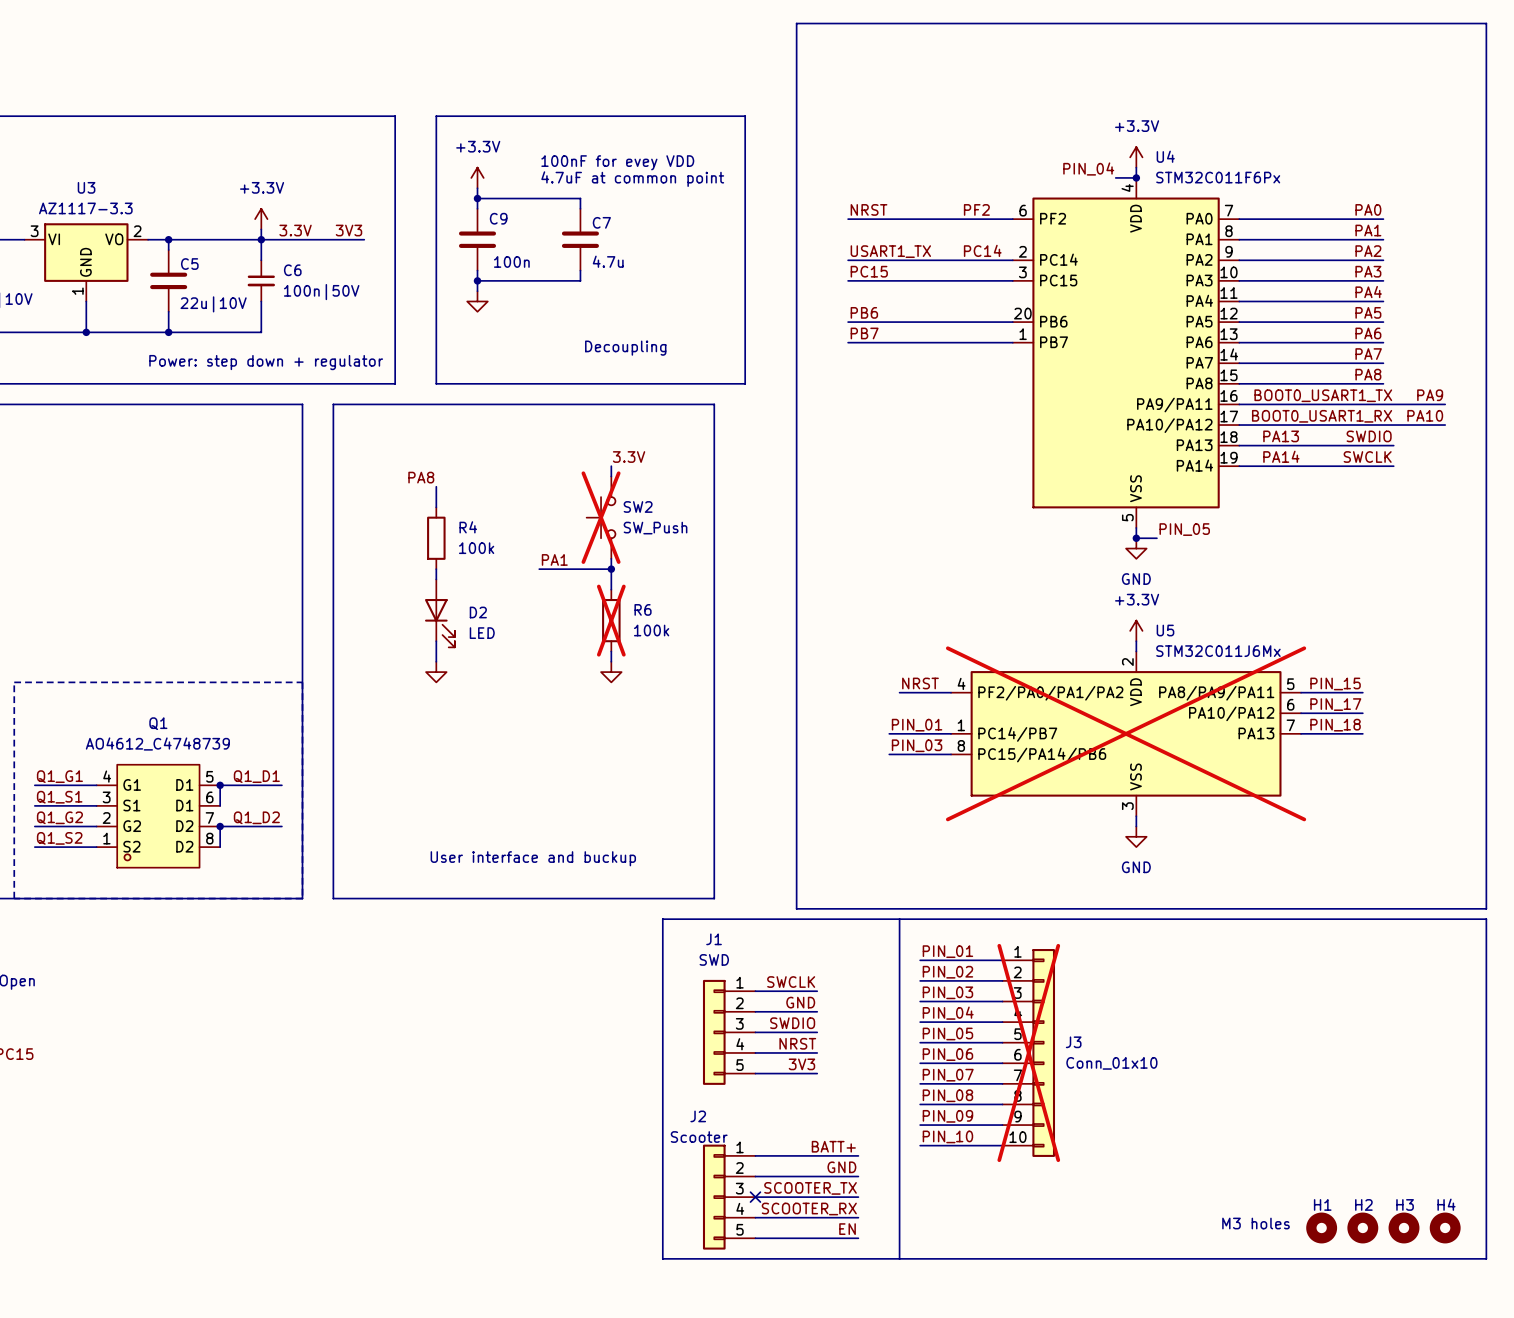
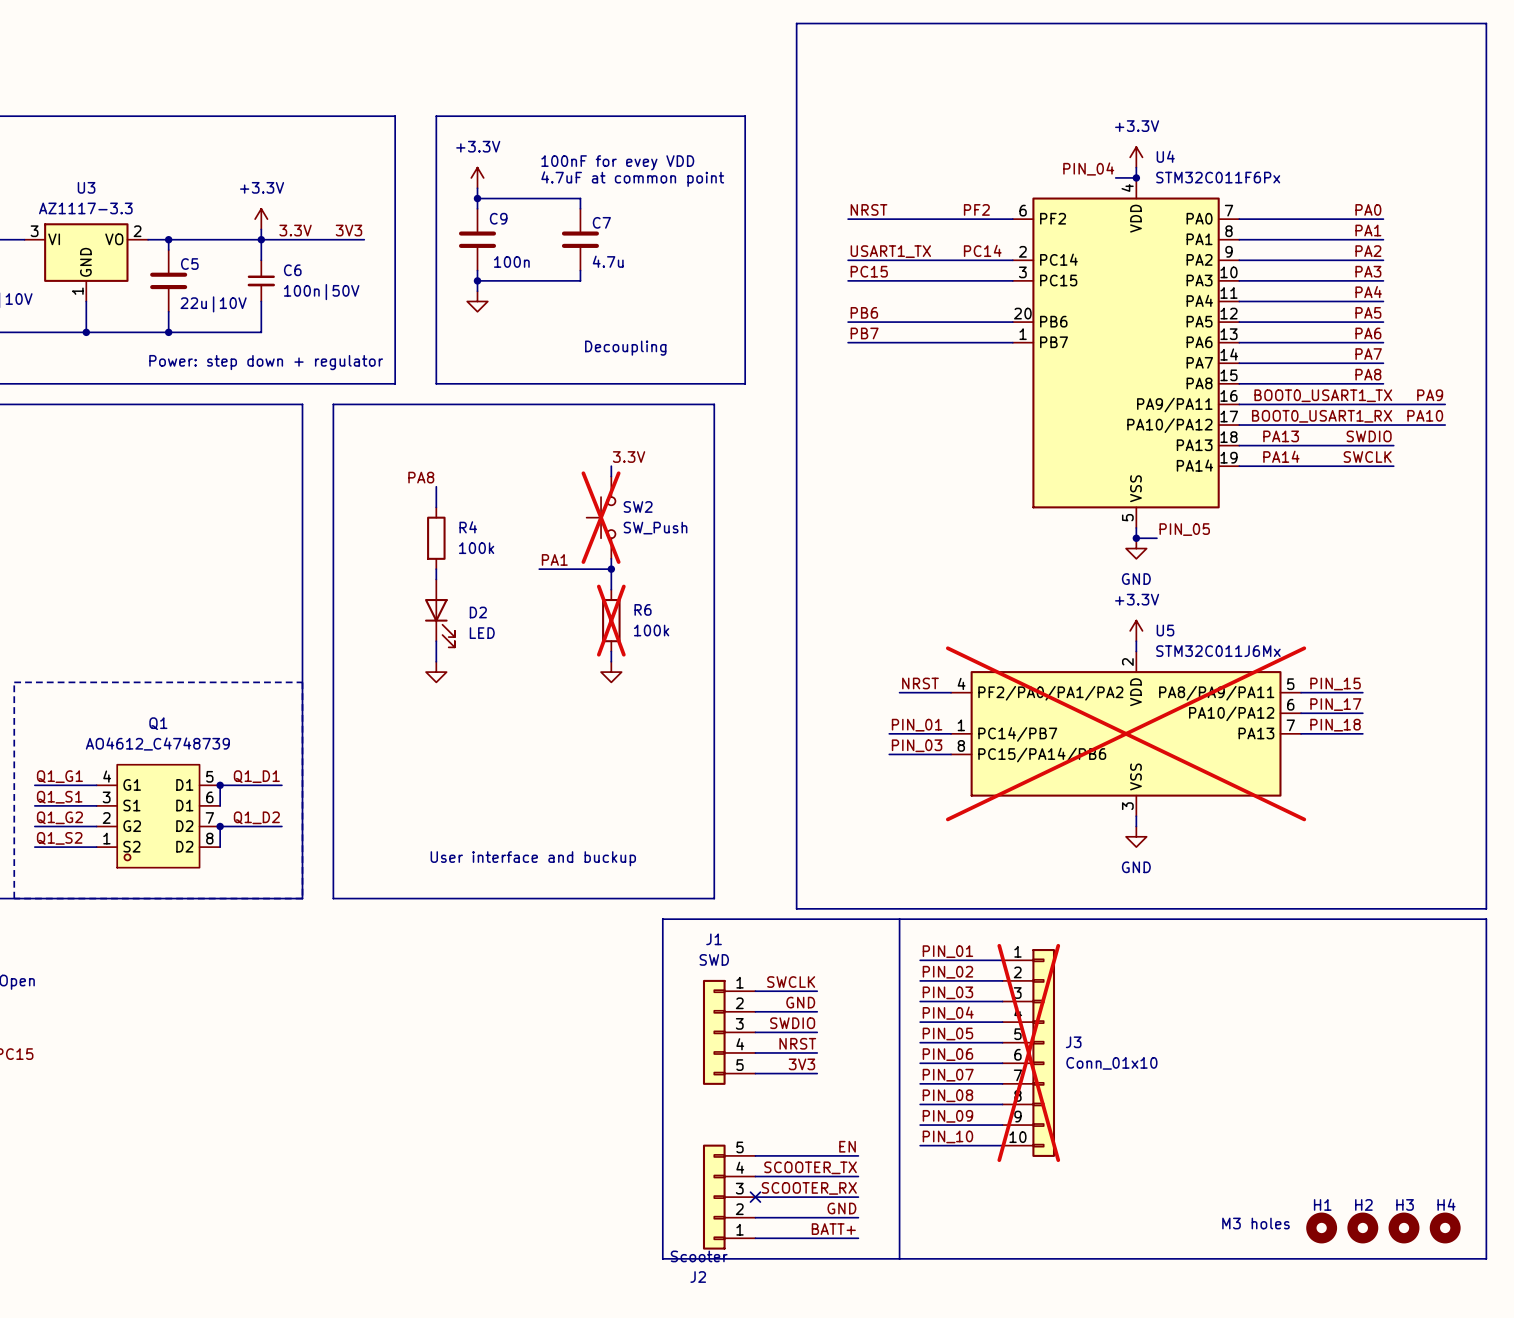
label: BATT+ (833, 1146) -> EN (847, 1146)
label: GND (841, 1167) -> SCOOTER_TX (810, 1167)
label: SCOOTER_TX (810, 1188) -> SCOOTER_RX (809, 1188)
J2 flip: as is (714, 1197) -> up-down (714, 1197)
label: SCOOTER_RX (809, 1208) -> GND (841, 1208)
label: EN (847, 1229) -> BATT+ (833, 1229)

